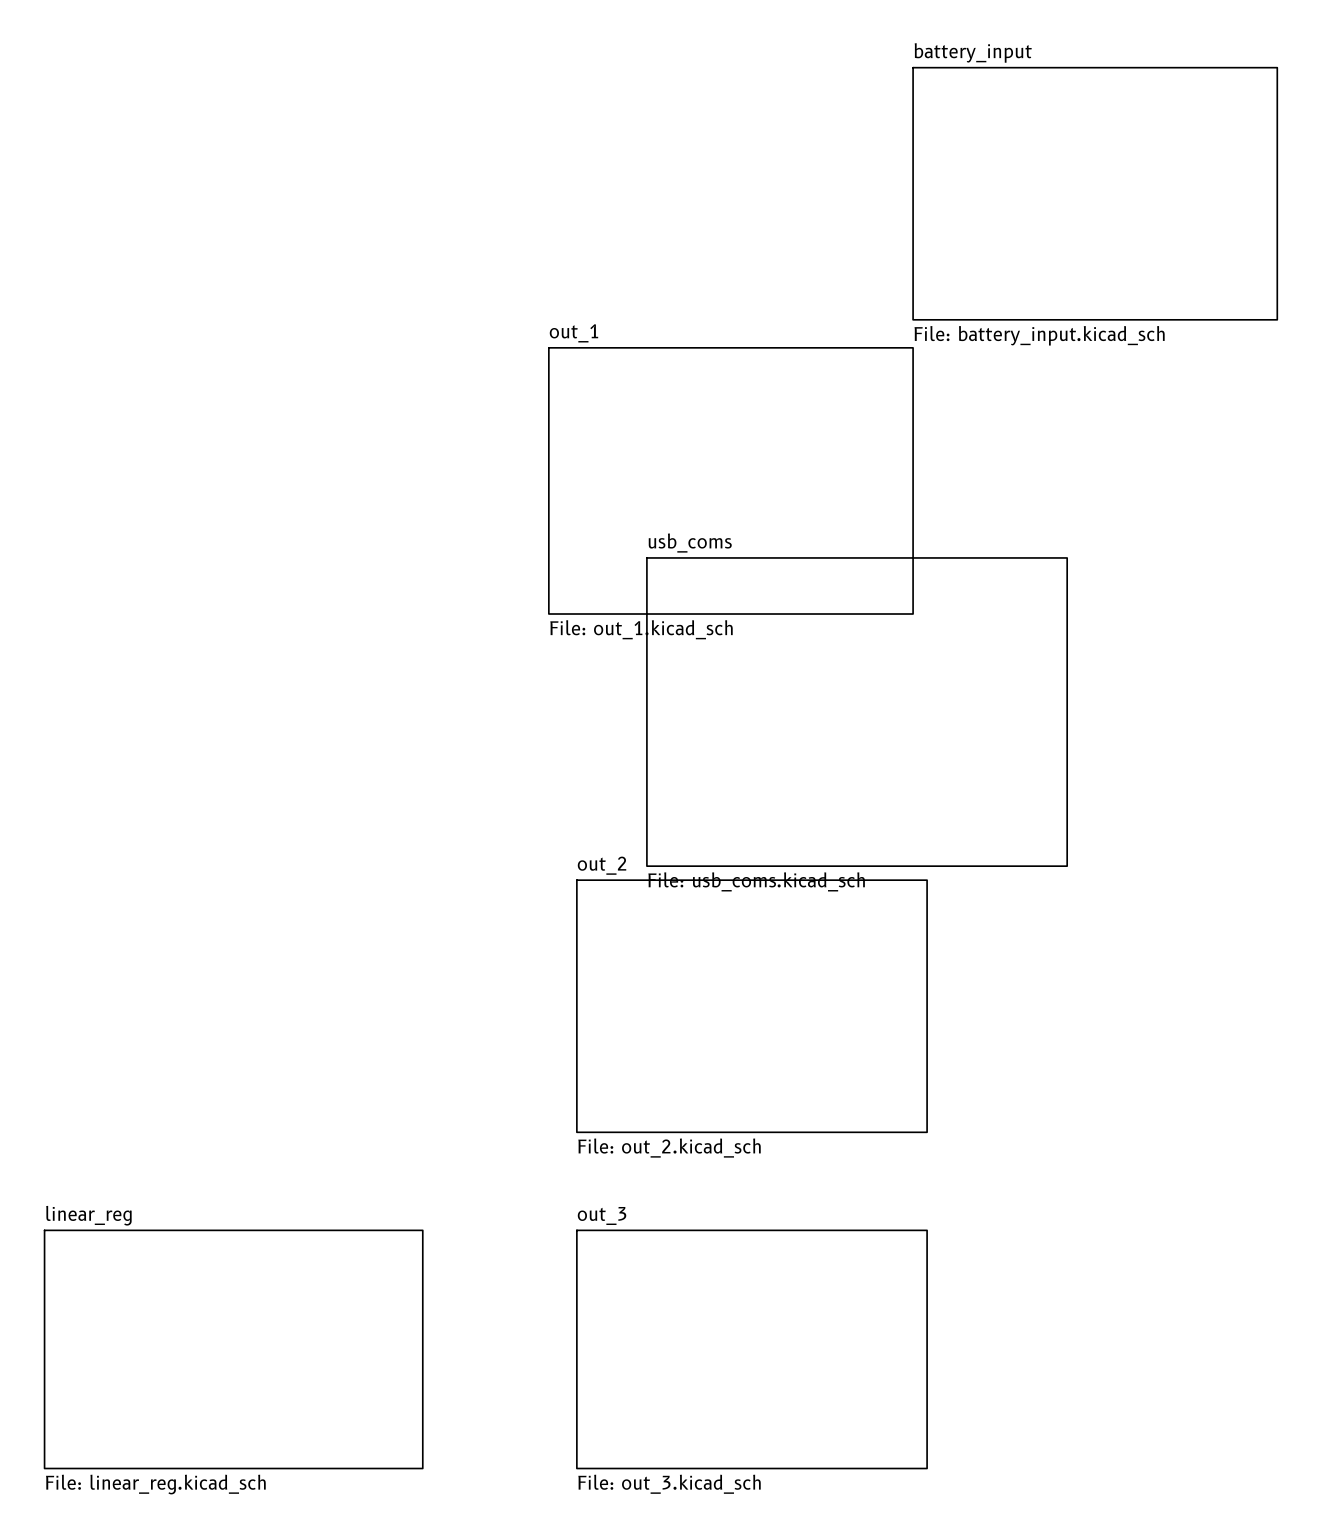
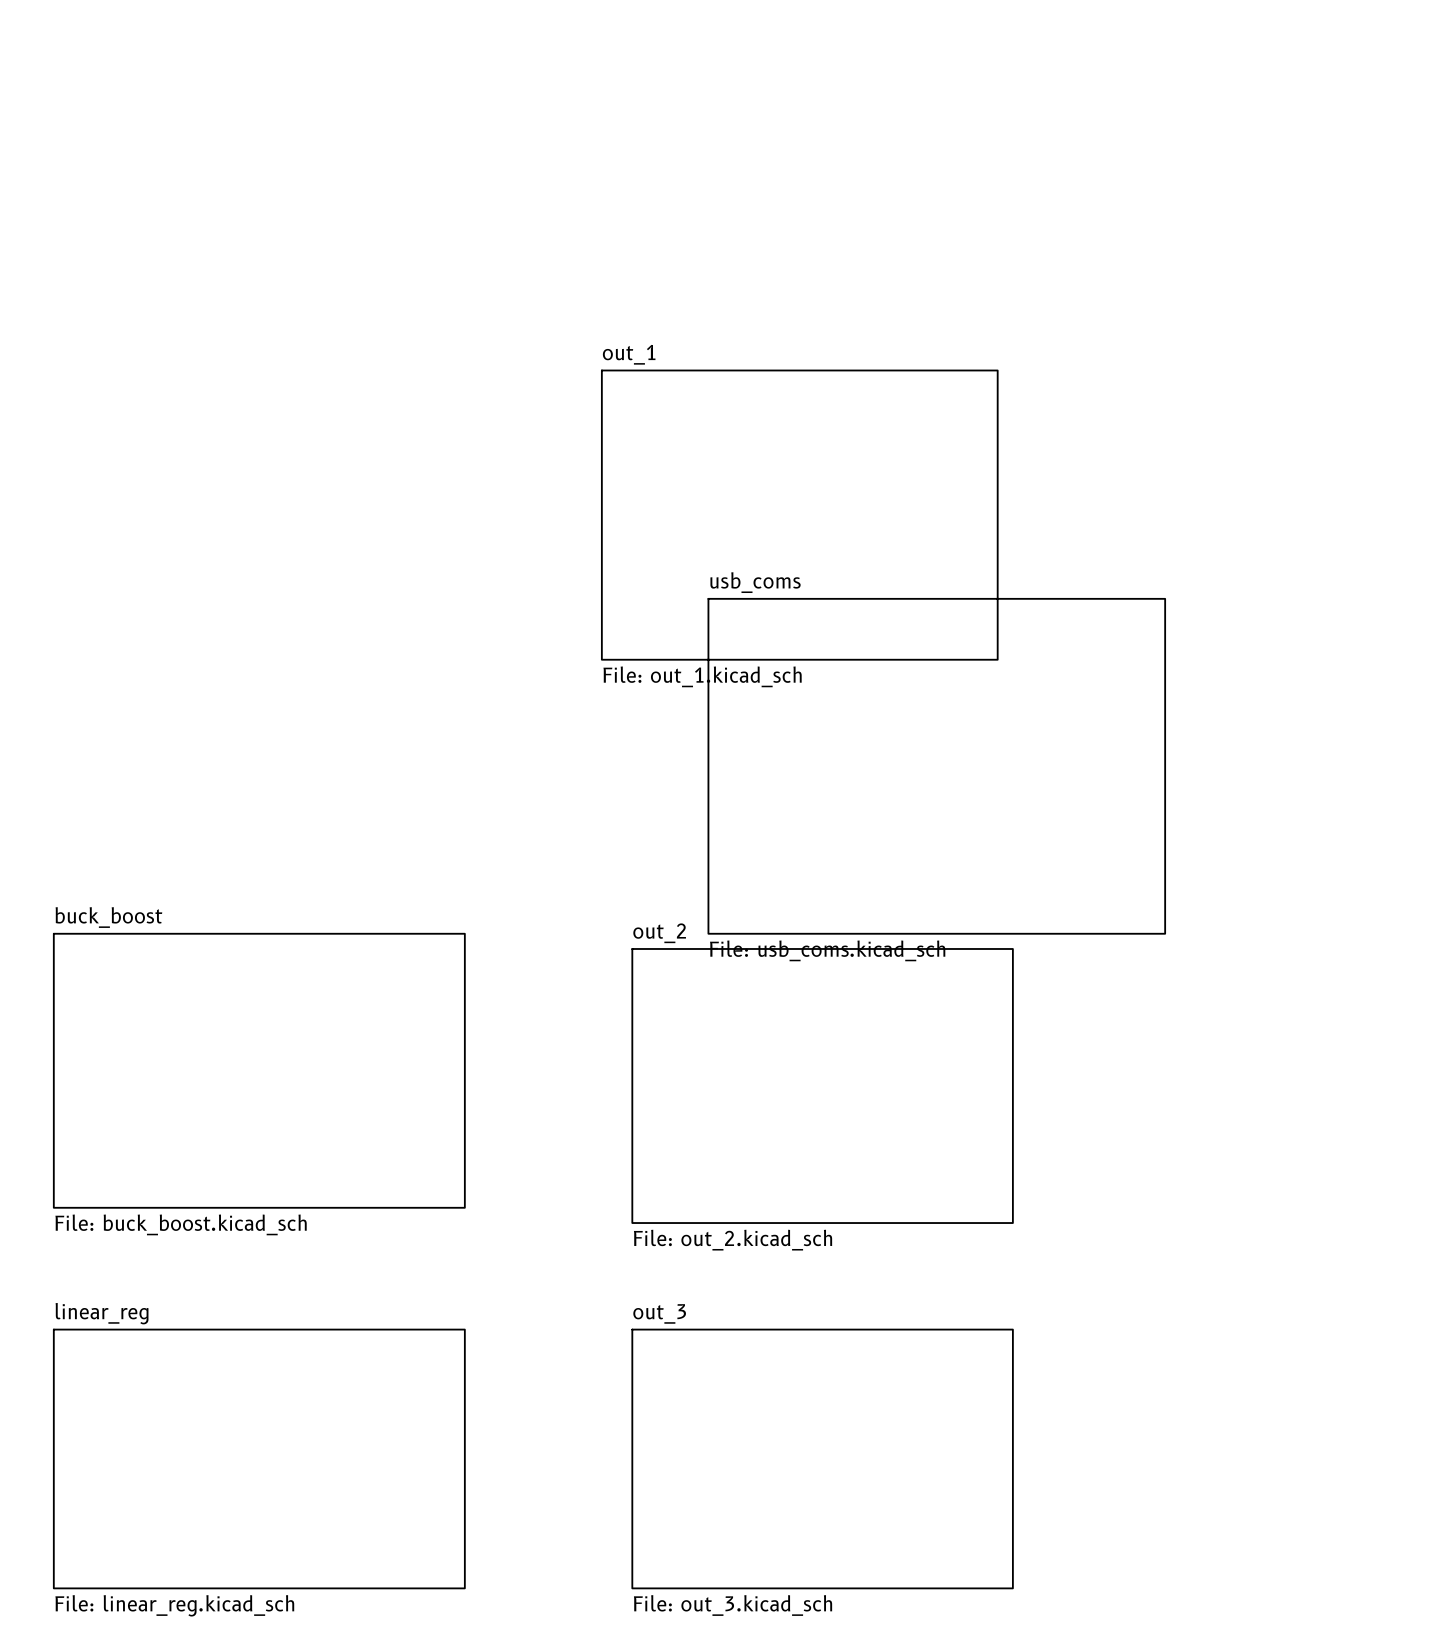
sheet battery_input: File: battery_input.kicad_sch (1095, 193) -> none
sheet buck_boost: none -> File: buck_boost.kicad_sch (259, 1070)

